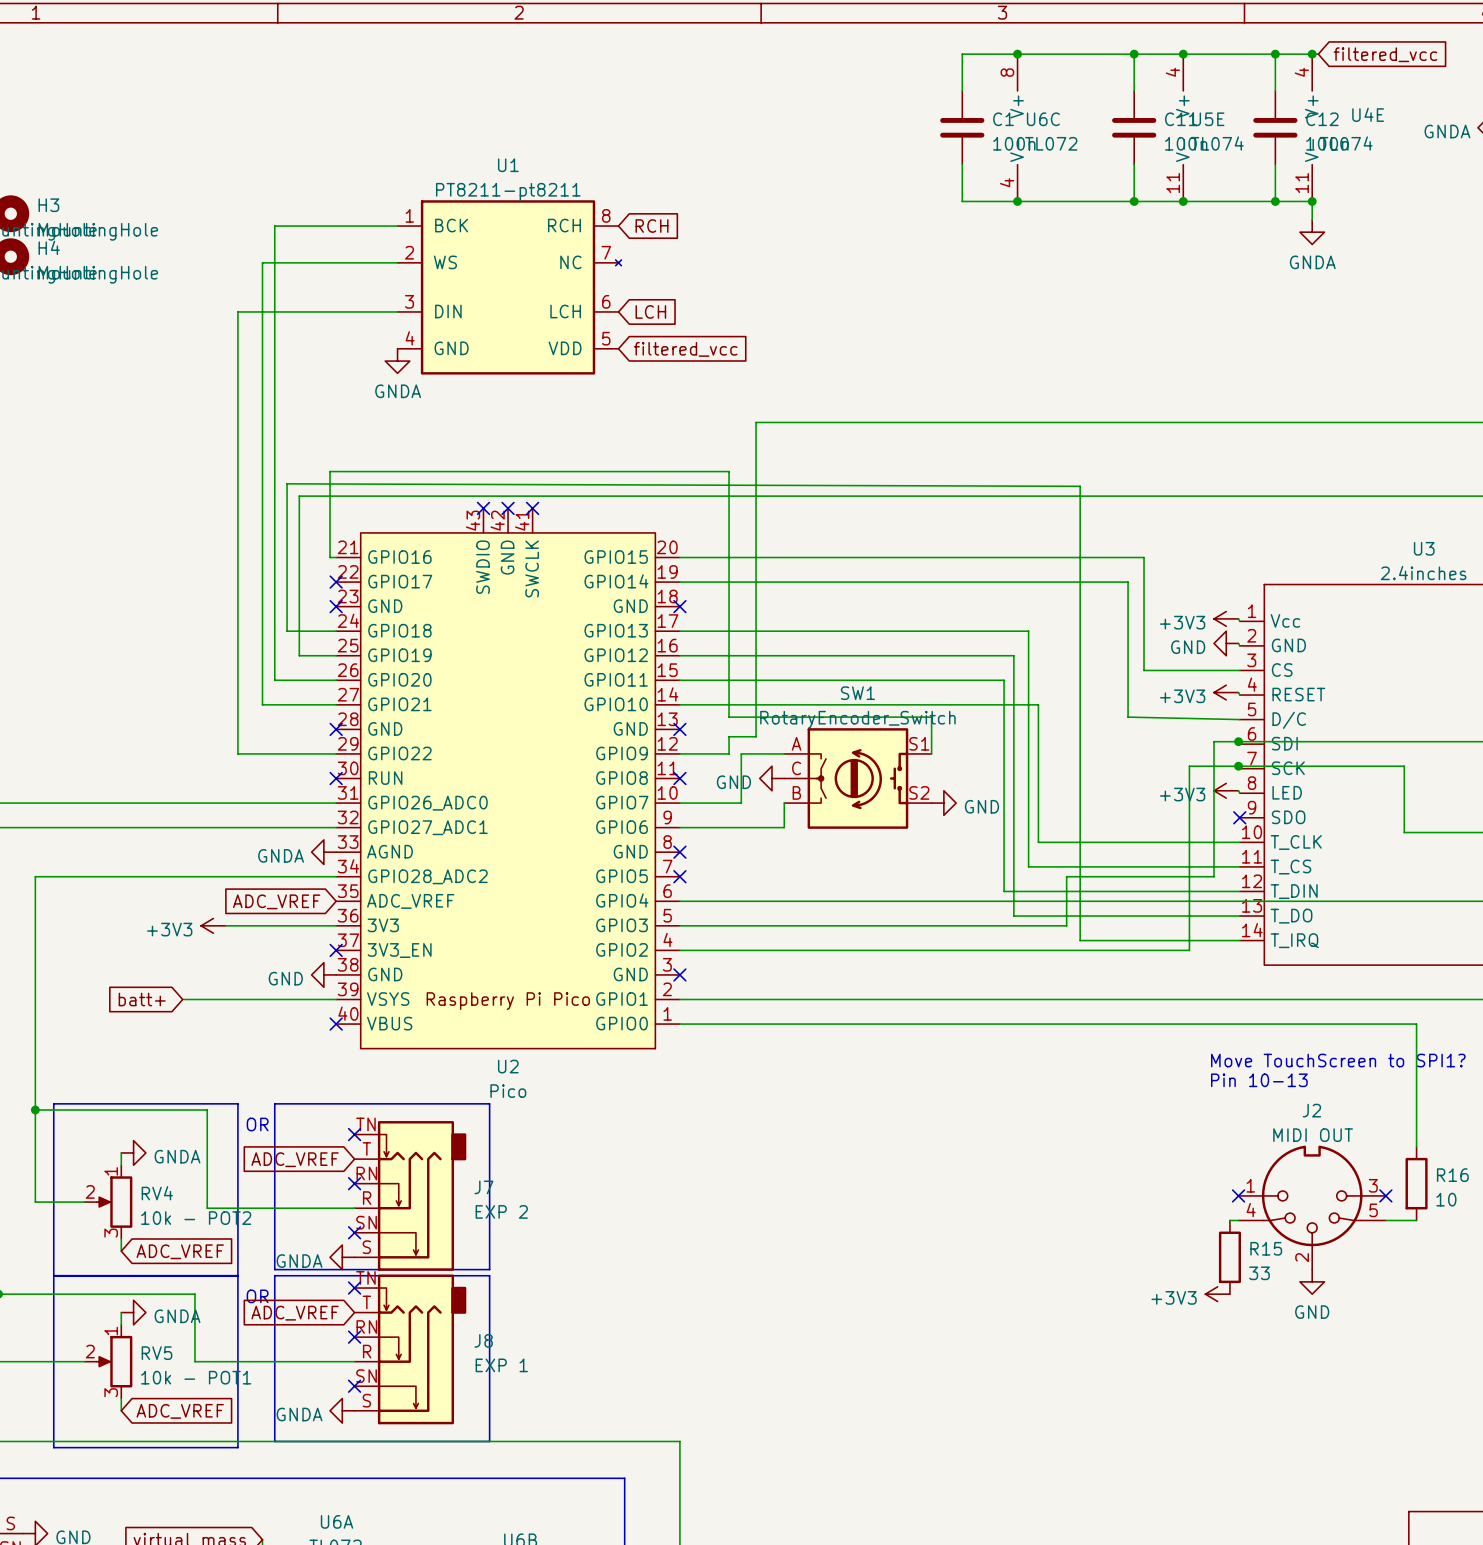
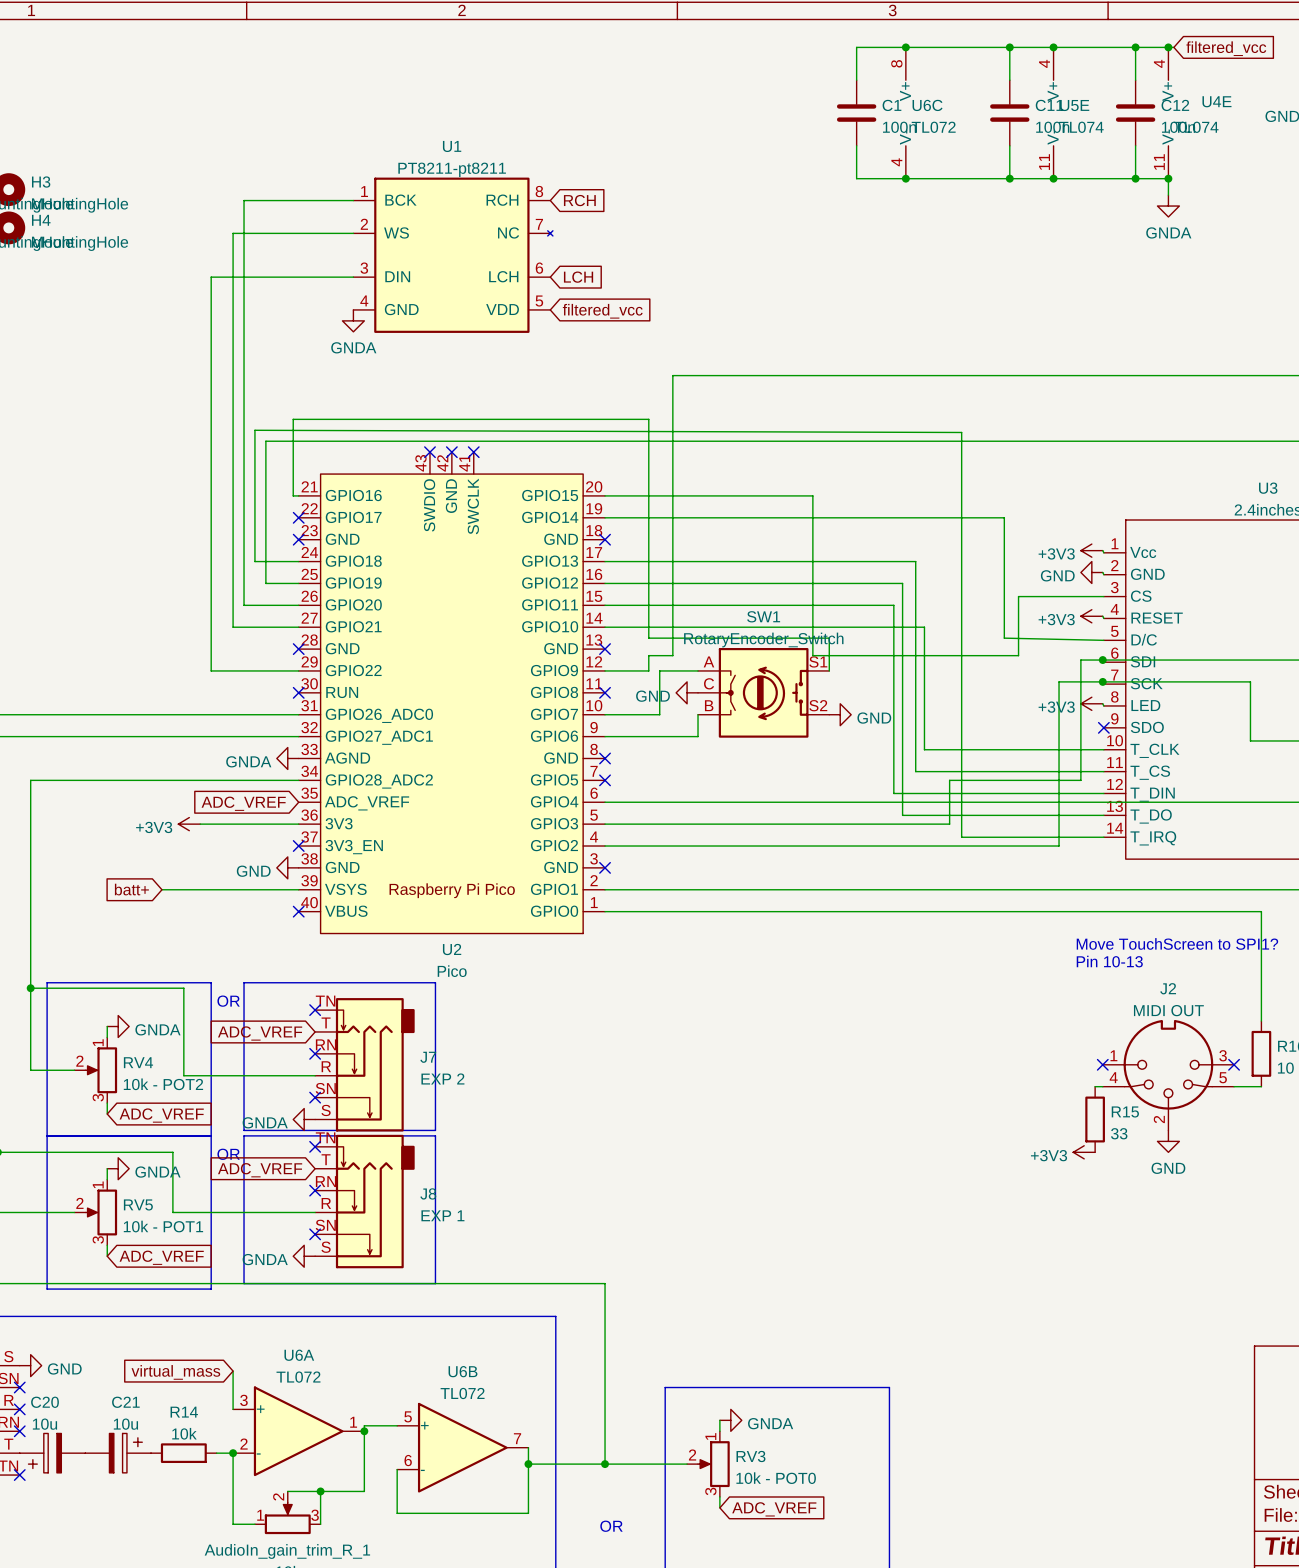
wire: (913, 557) (1144, 557) (1144, 670) -> (812, 495) (812, 655) (1018, 655) (1018, 596)

